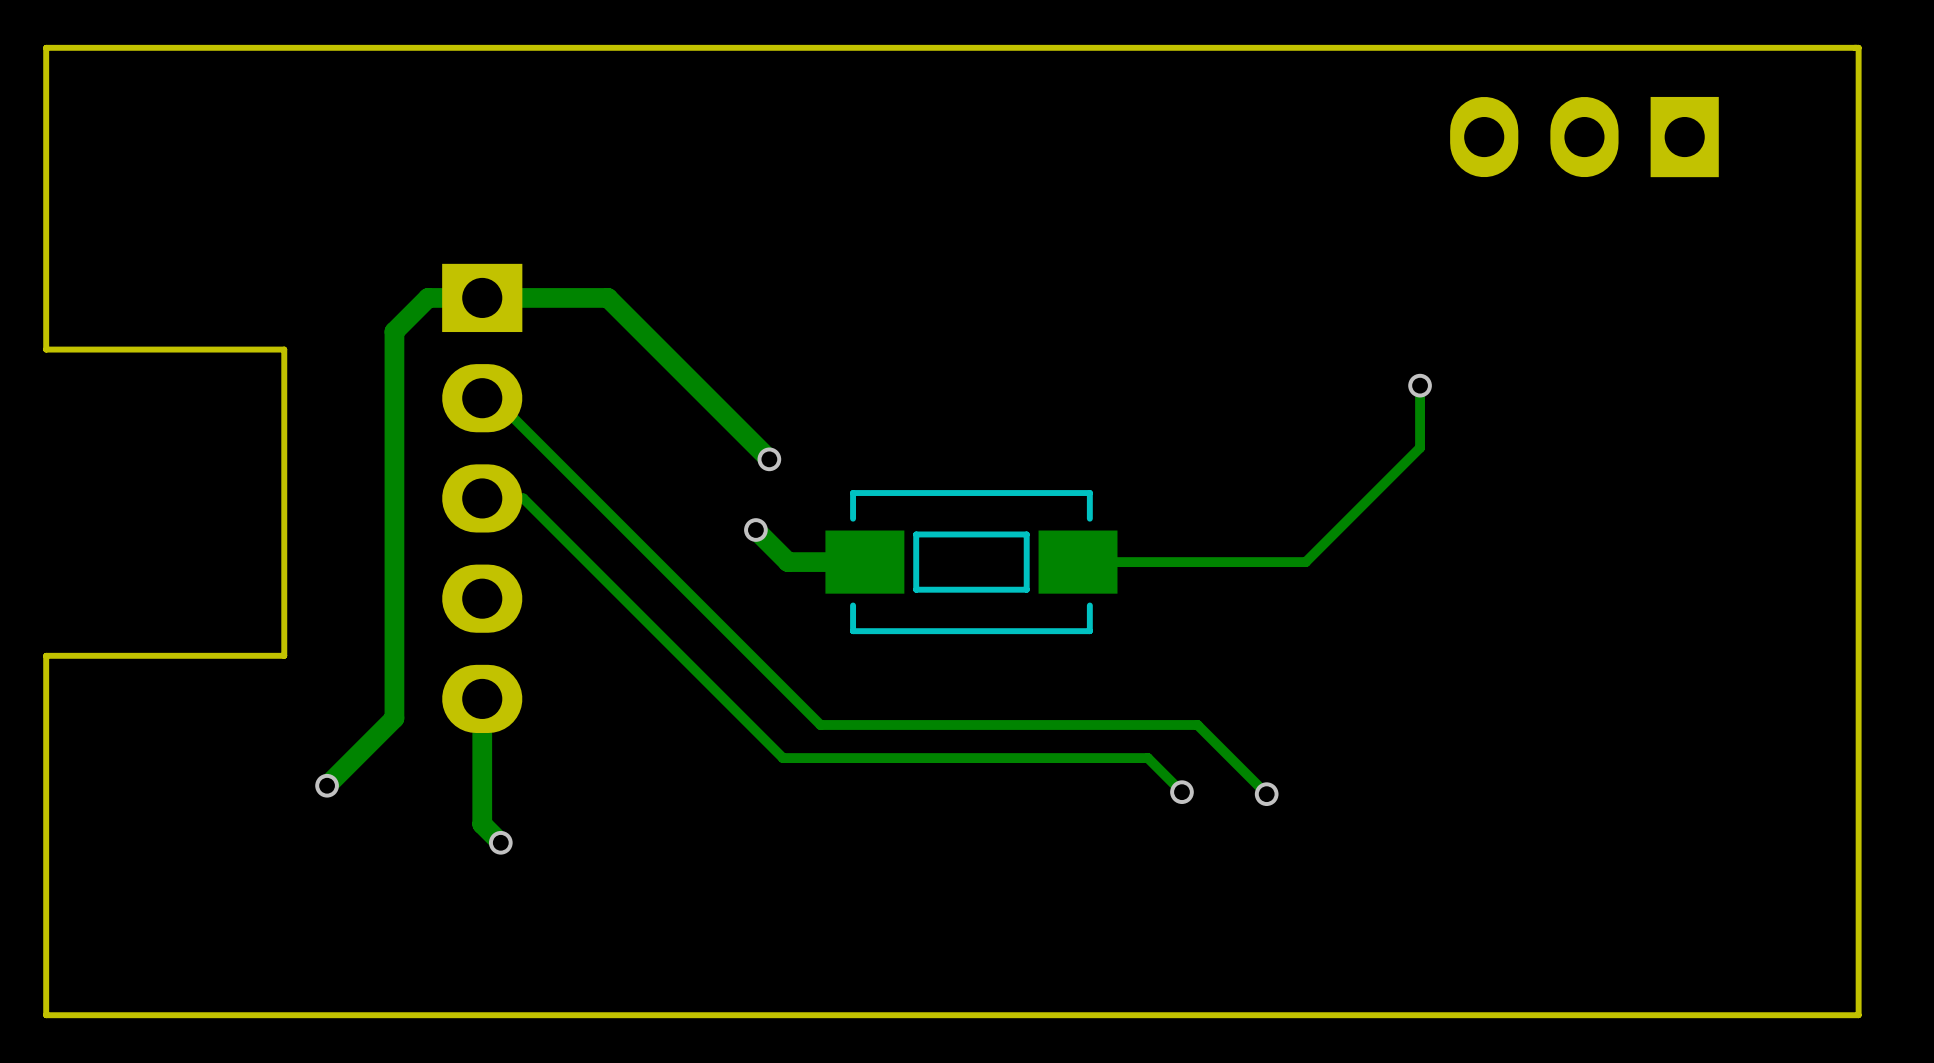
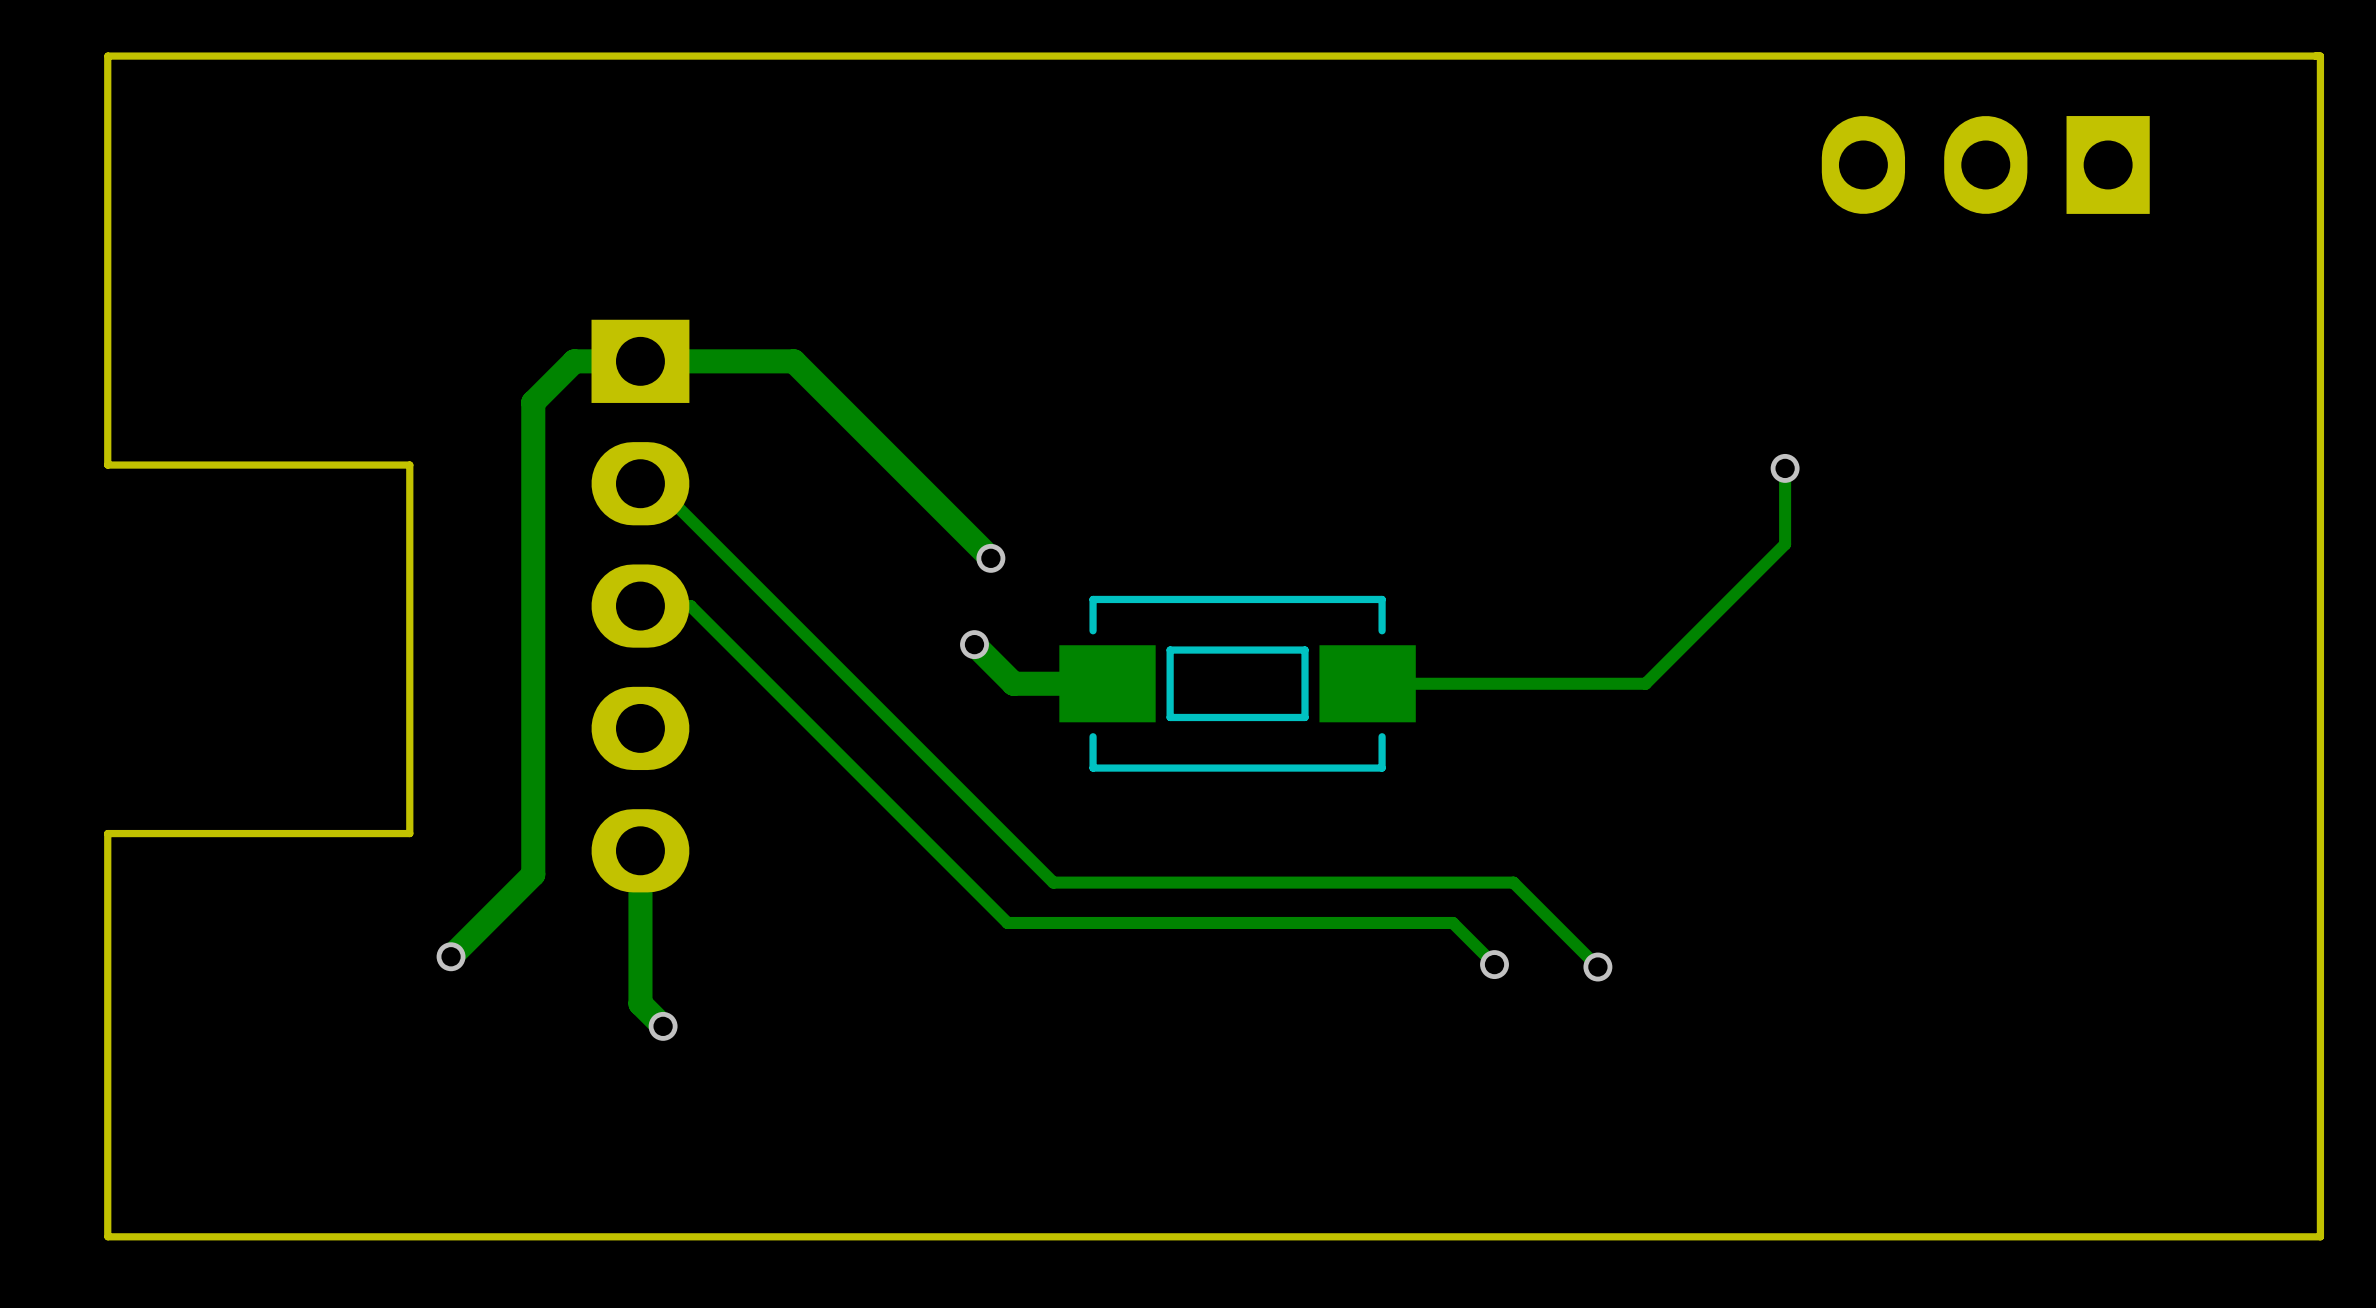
board edge: (46, 47) (46, 349) (284, 349) (284, 655) (46, 655) (46, 1015) -> (107, 56) (107, 465) (409, 465) (409, 833) (107, 833) (107, 1236)

